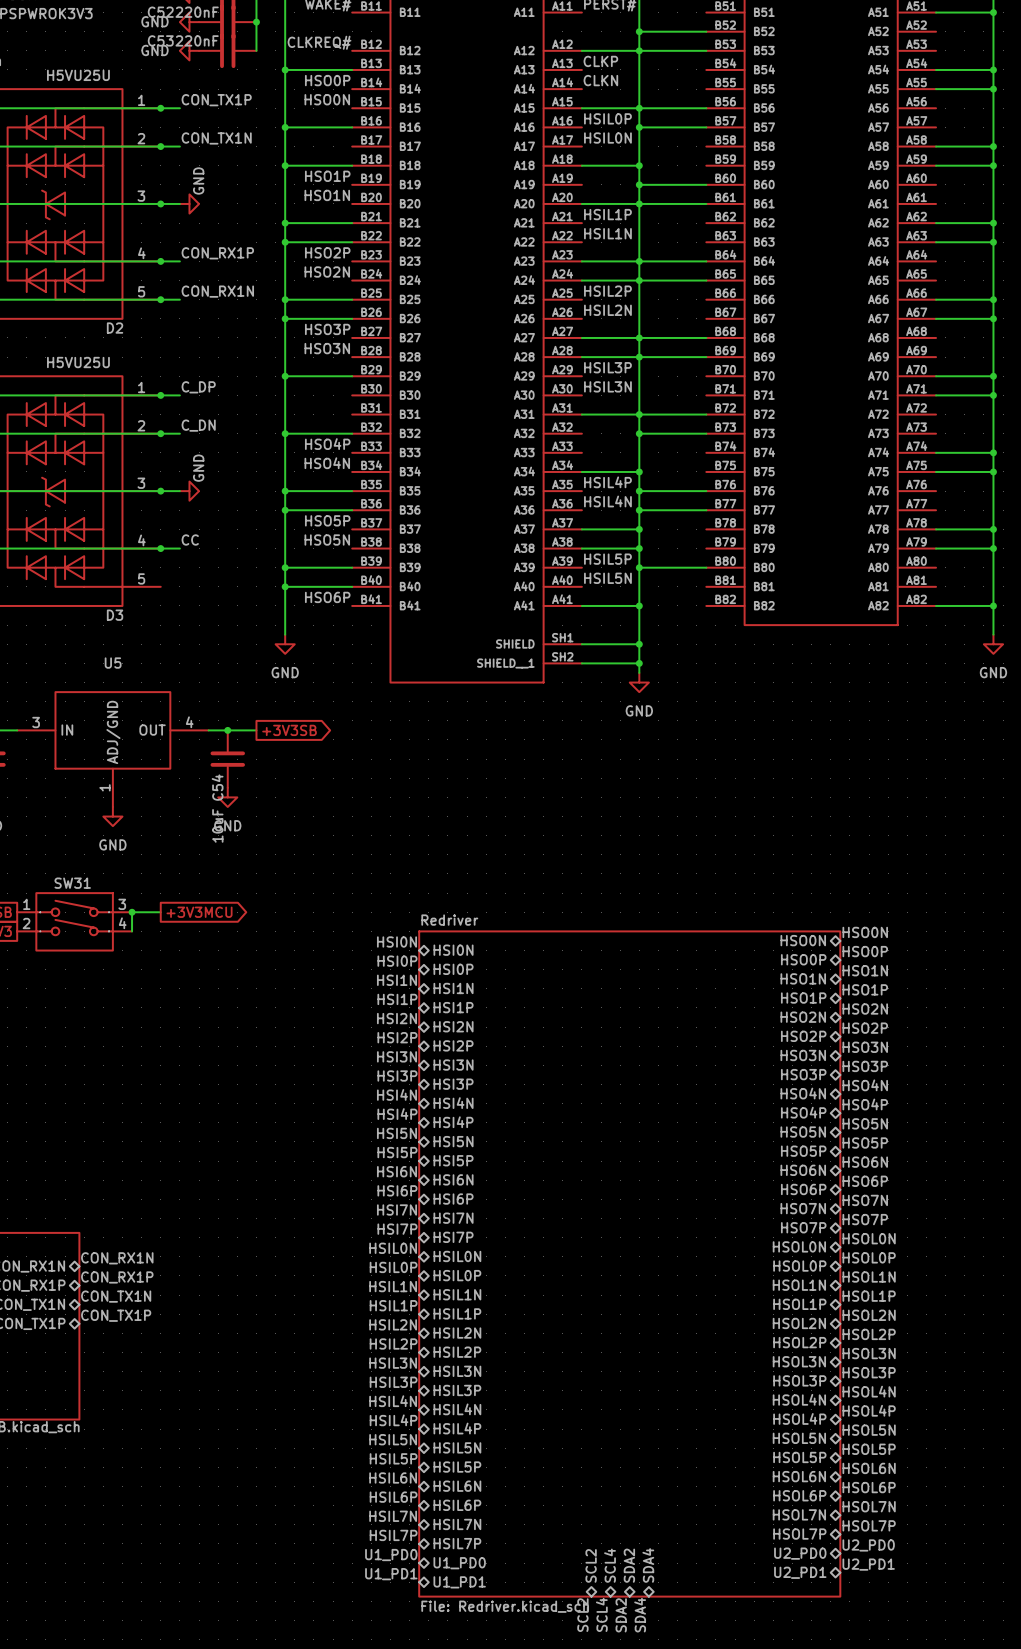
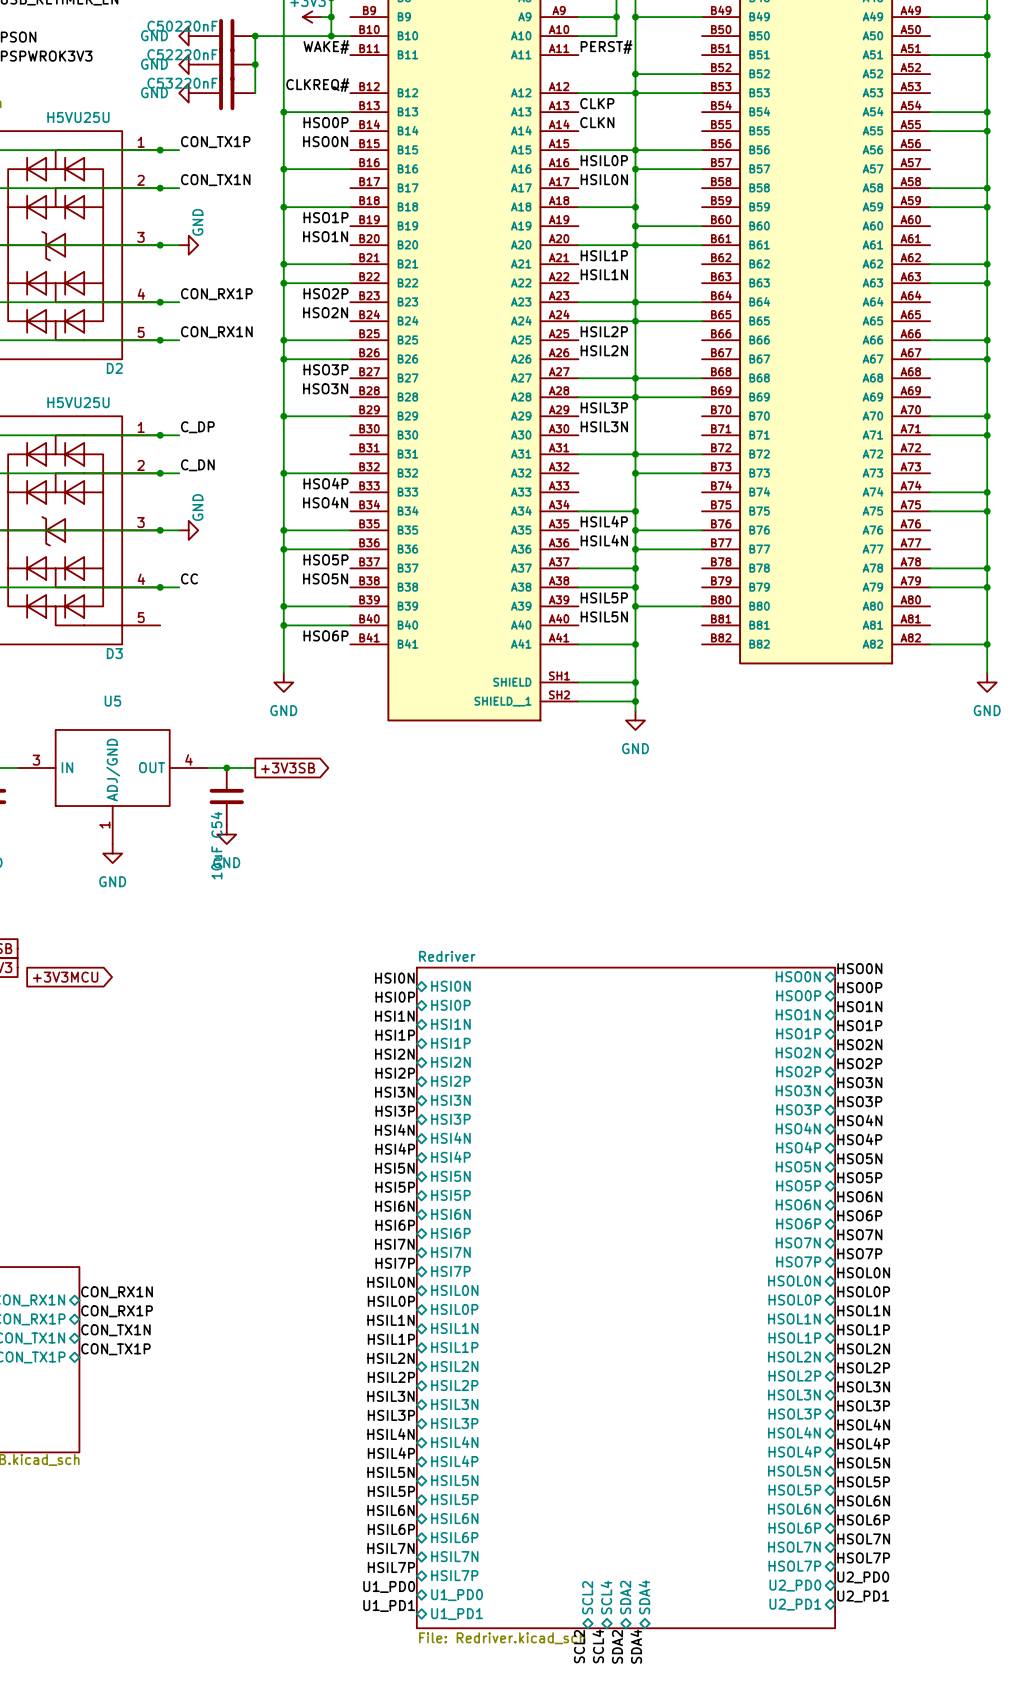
junction: (132, 912) -> none
wire: (160, 912) (132, 912) (132, 931) -> none
global label position: +3V3MCU (199, 912) -> +3V3MCU (65, 977)
SW31: (74, 921) -> none

